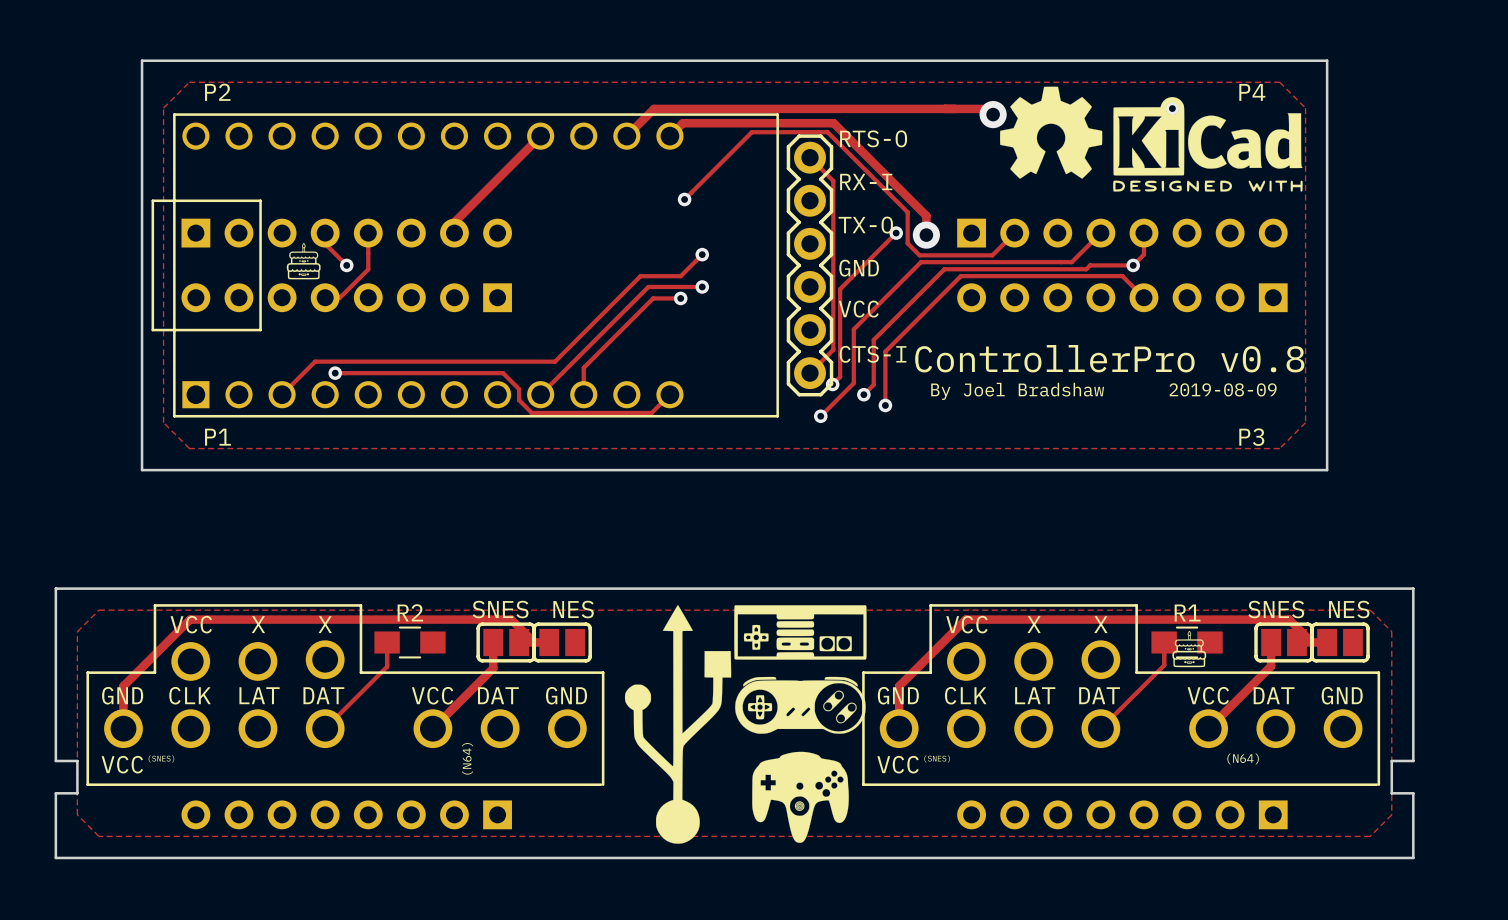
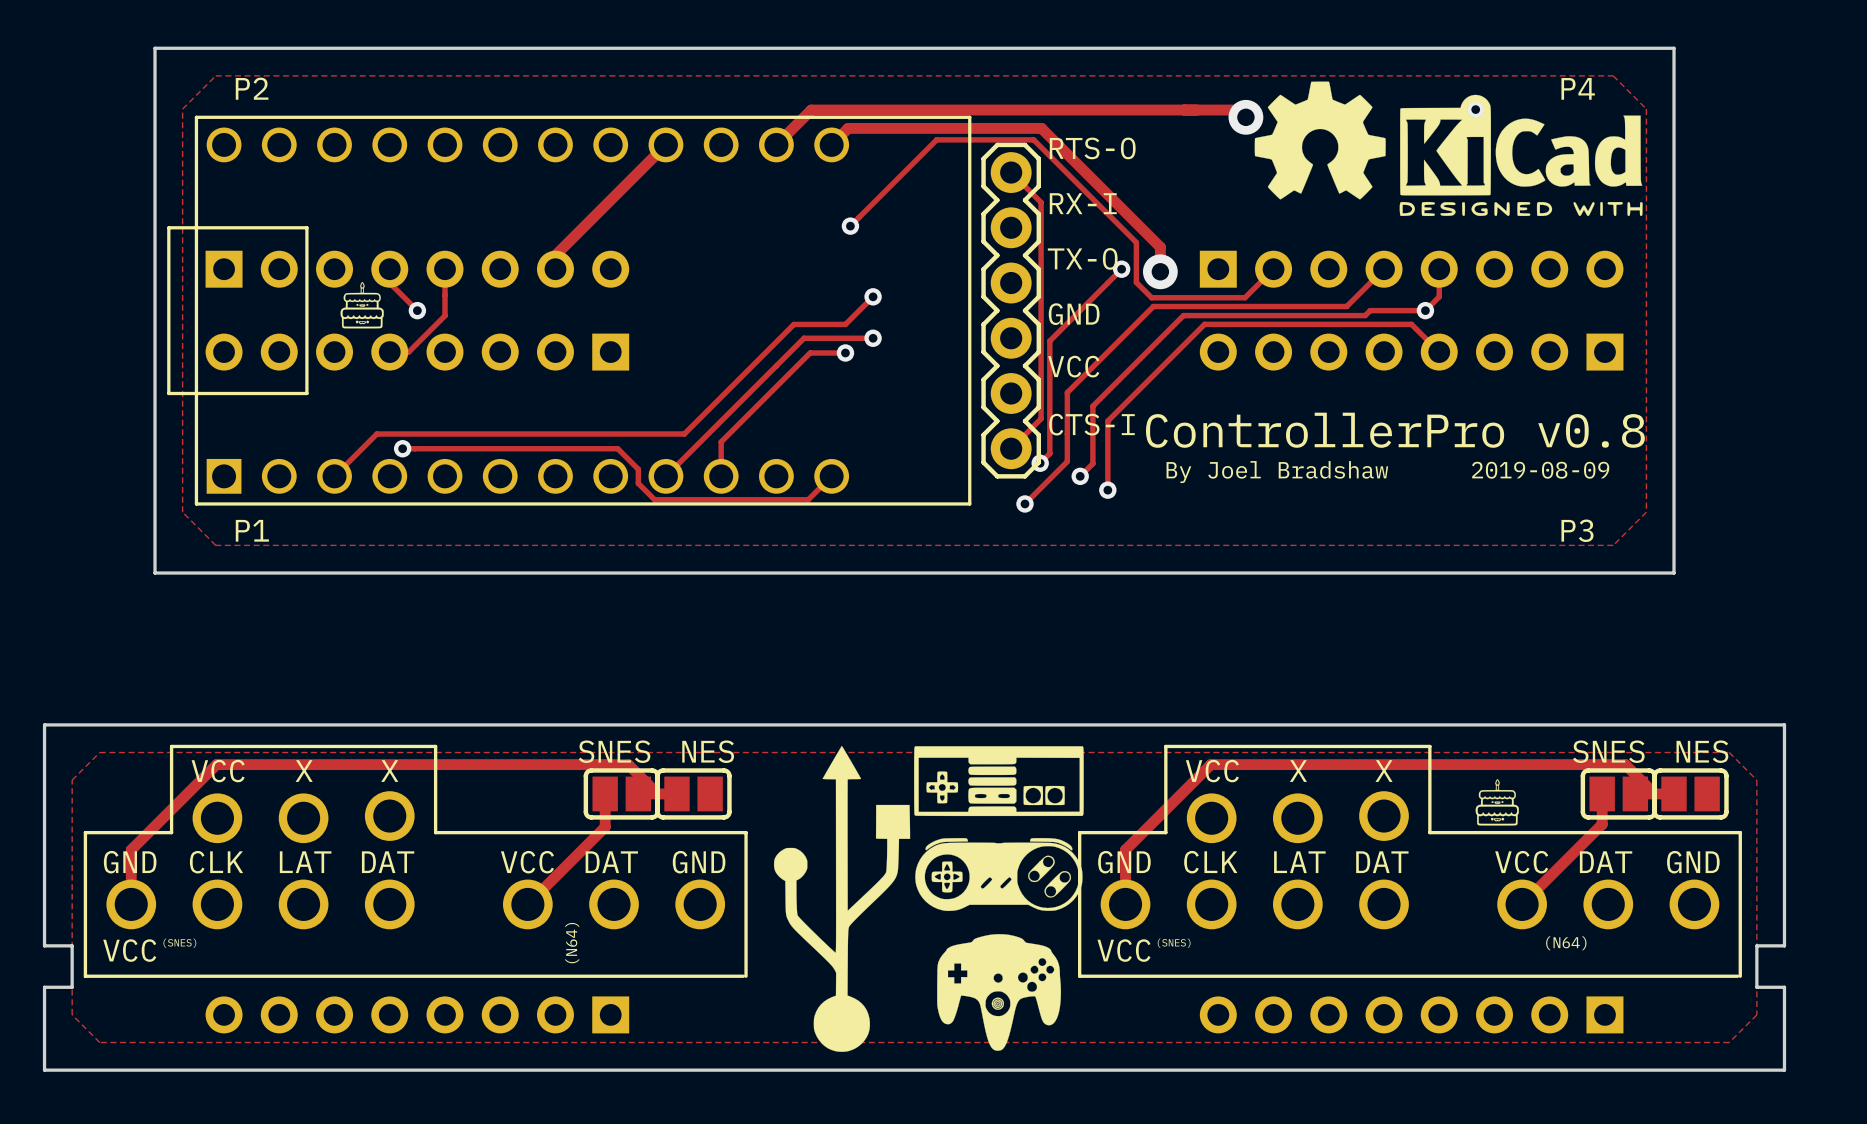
track: (387, 642) (387, 666) (325, 728) -> none
R2: (410, 642) -> none
track: (1164, 642) (1164, 665) (1100, 728) -> none
R1: (1187, 642) -> none

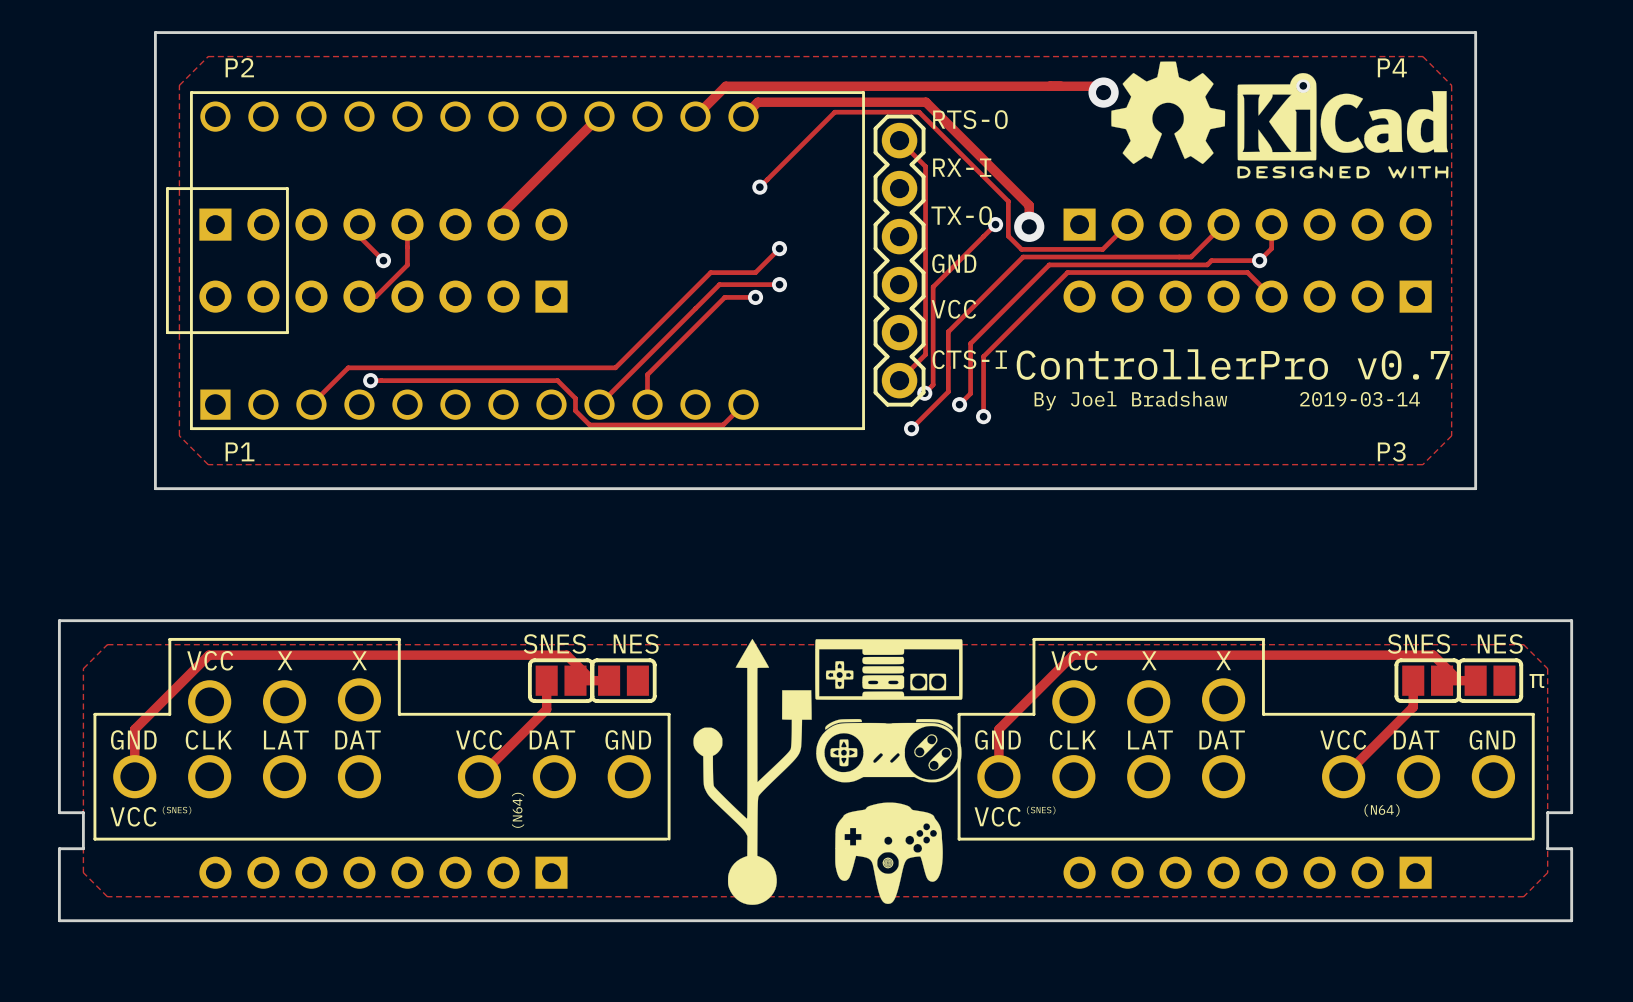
drawing: [340, 282, 384, 329] -> none
text: ControllerPro v0.8 (1395, 430) -> ControllerPro v0.7 (1233, 364)
text: 2019-08-09 (1540, 470) -> 2019-03-14 (1360, 399)
drawing: [1475, 779, 1519, 826] -> none
text: none -> π (1536, 681)

